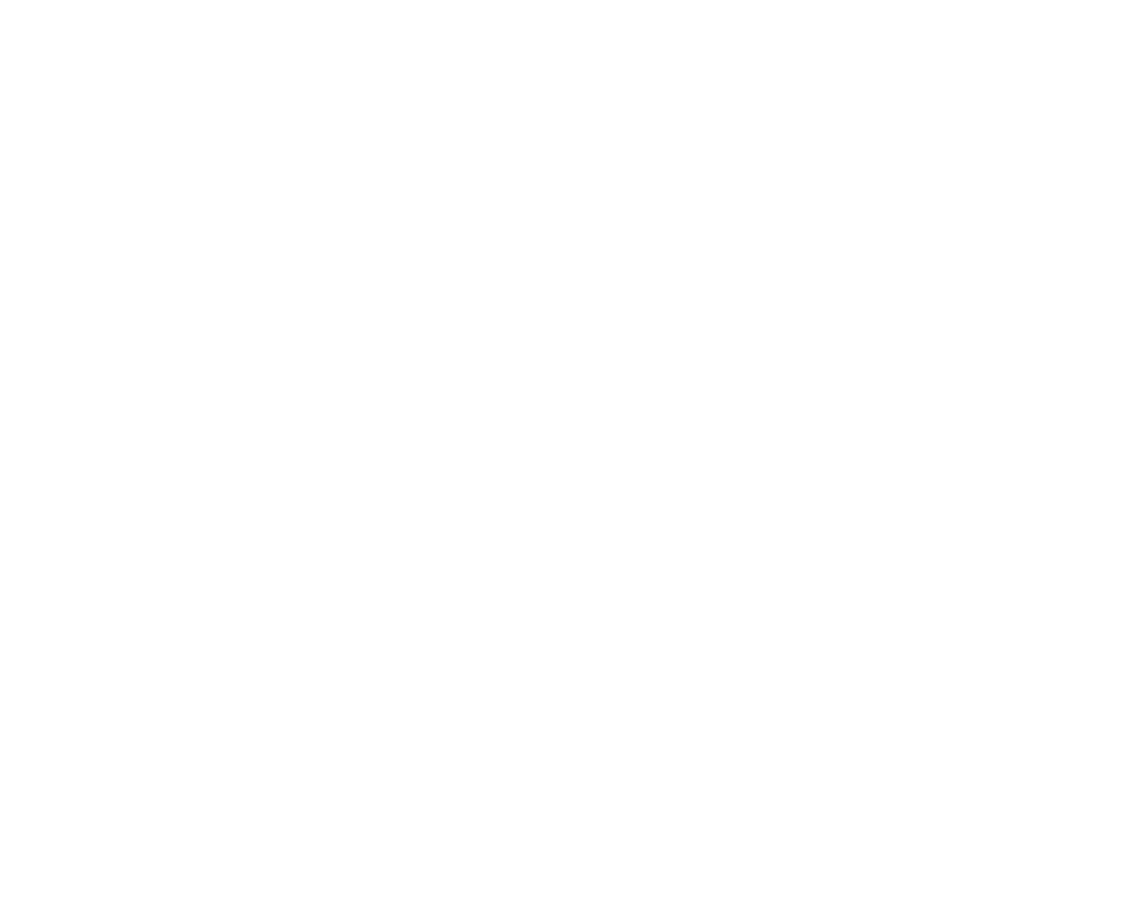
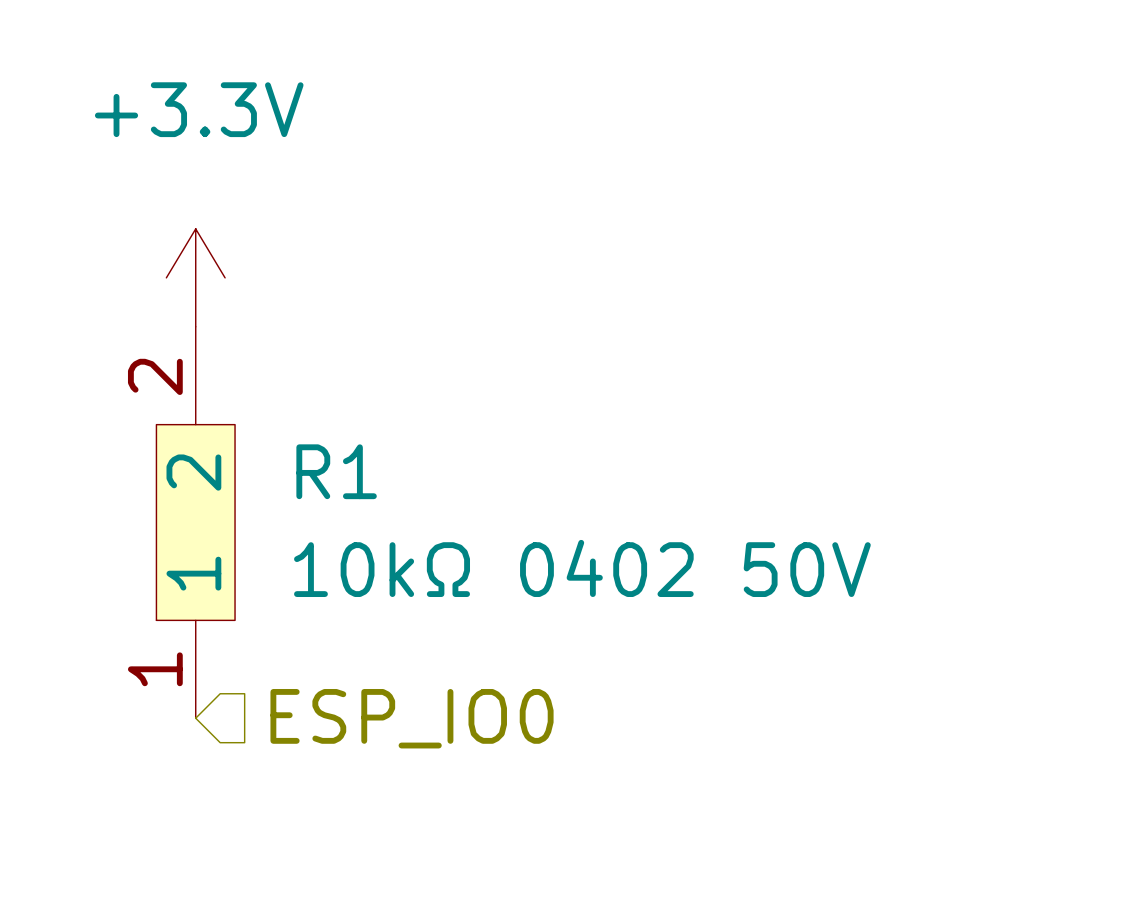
power symbol: none -> +3.3V (195, 277)
R1: none -> 10kΩ 0402 50V (195, 522)
hierarchical label: none -> ESP_IO0 (412, 718)

